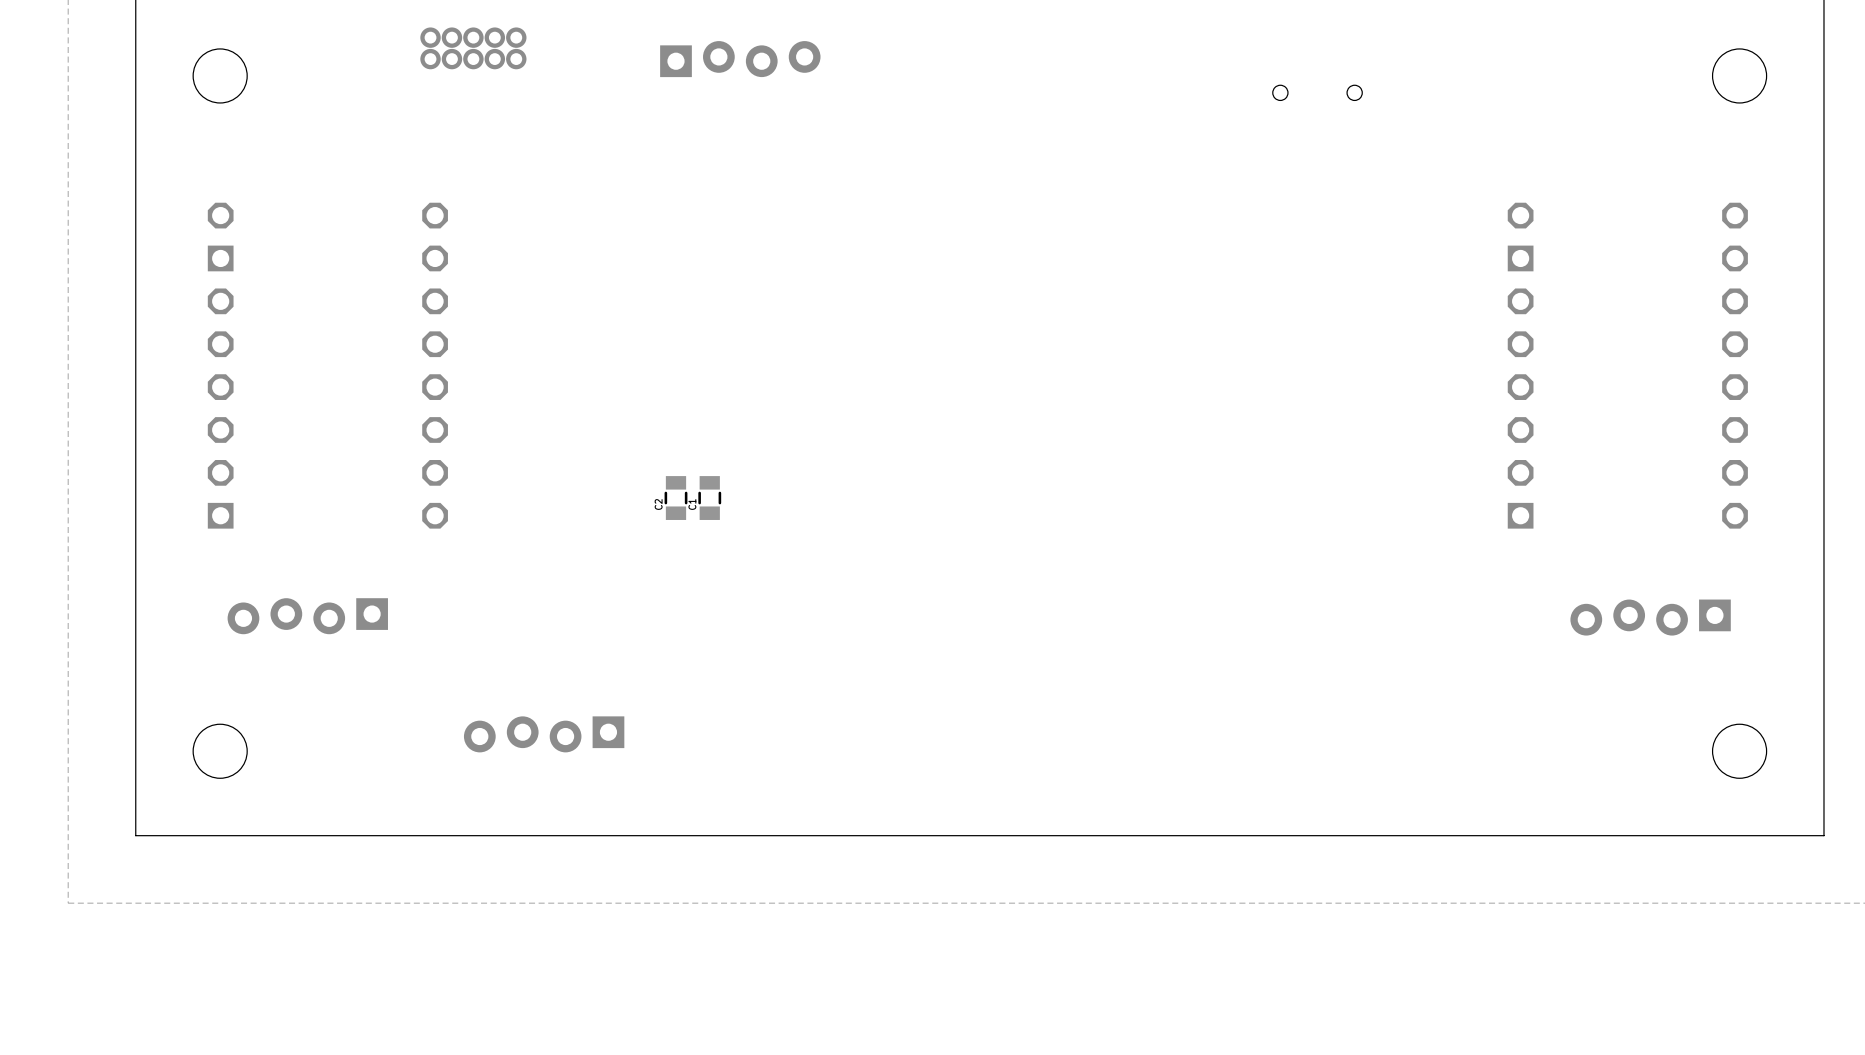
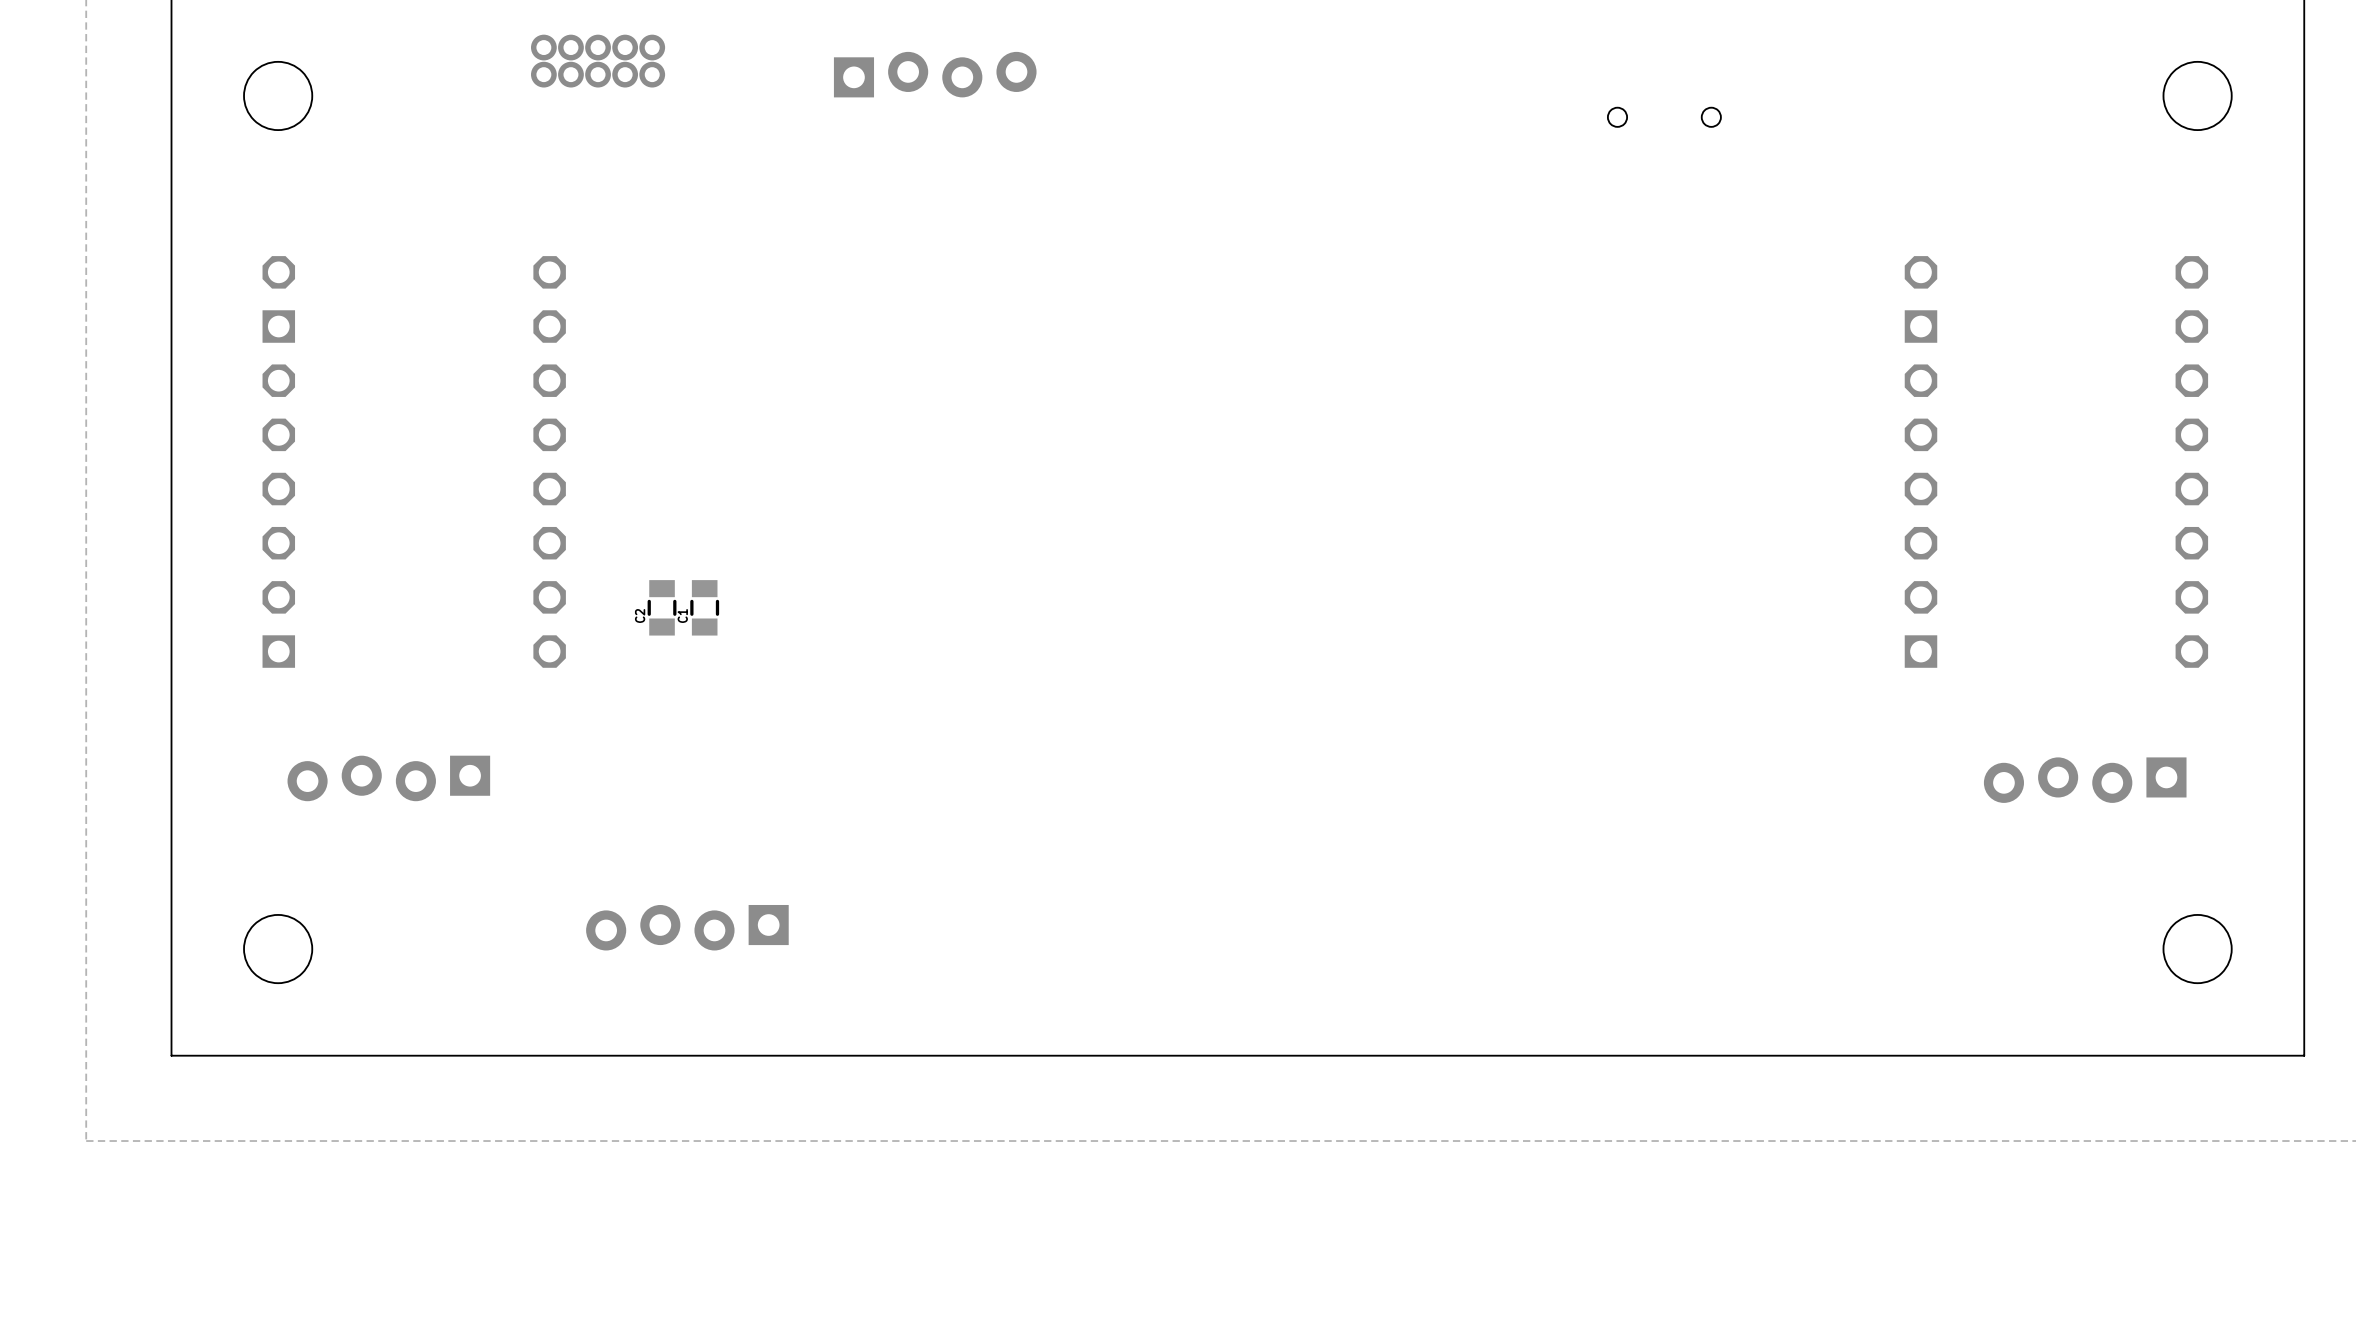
C2 position: (675, 498) -> (662, 607)
C1 position: (709, 498) -> (704, 607)

